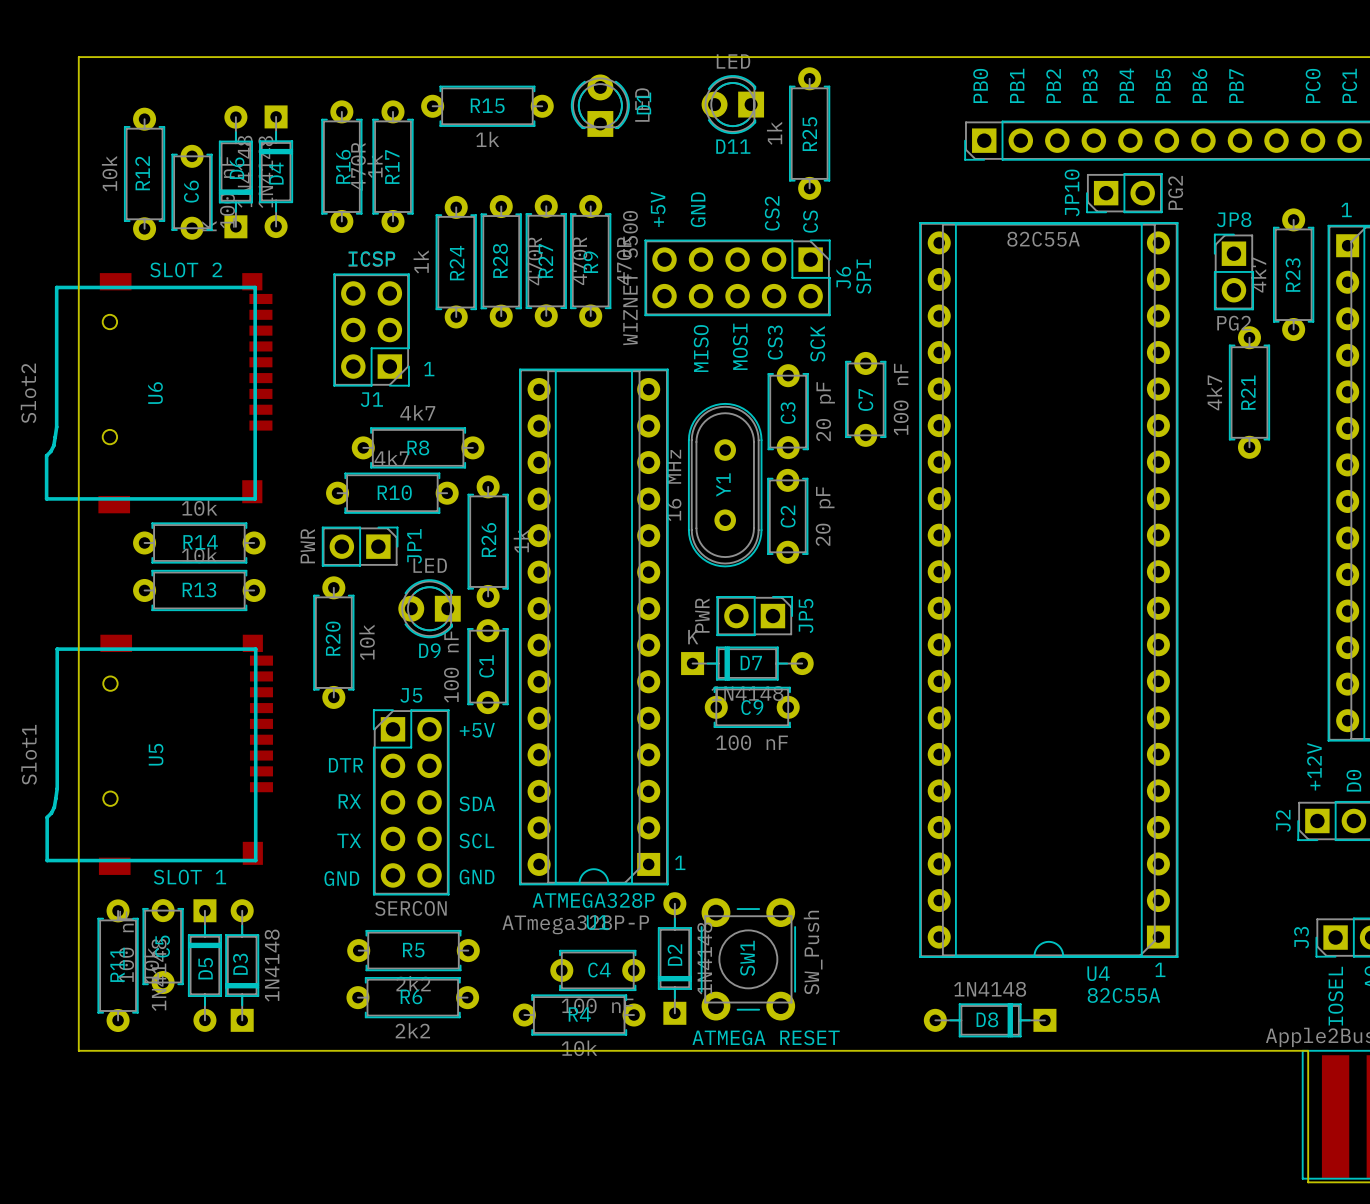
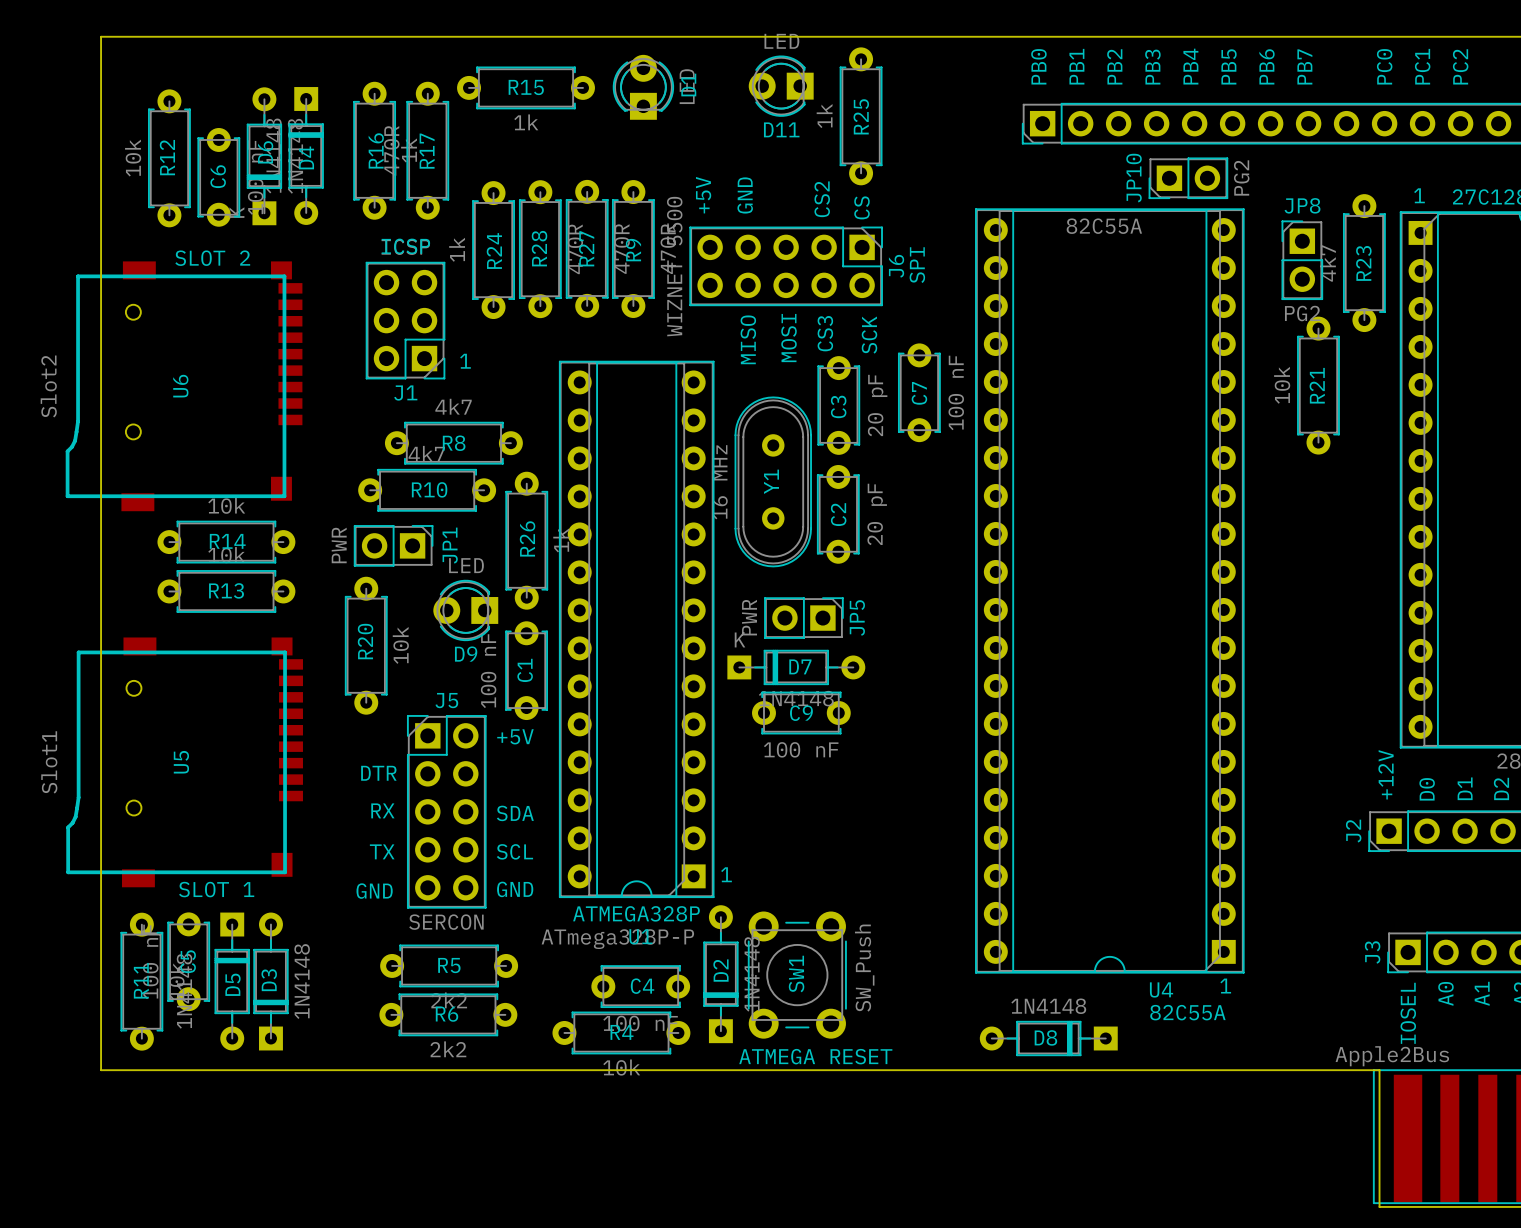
R21 value: 4k7 (1214, 392) -> 10k (1282, 385)

